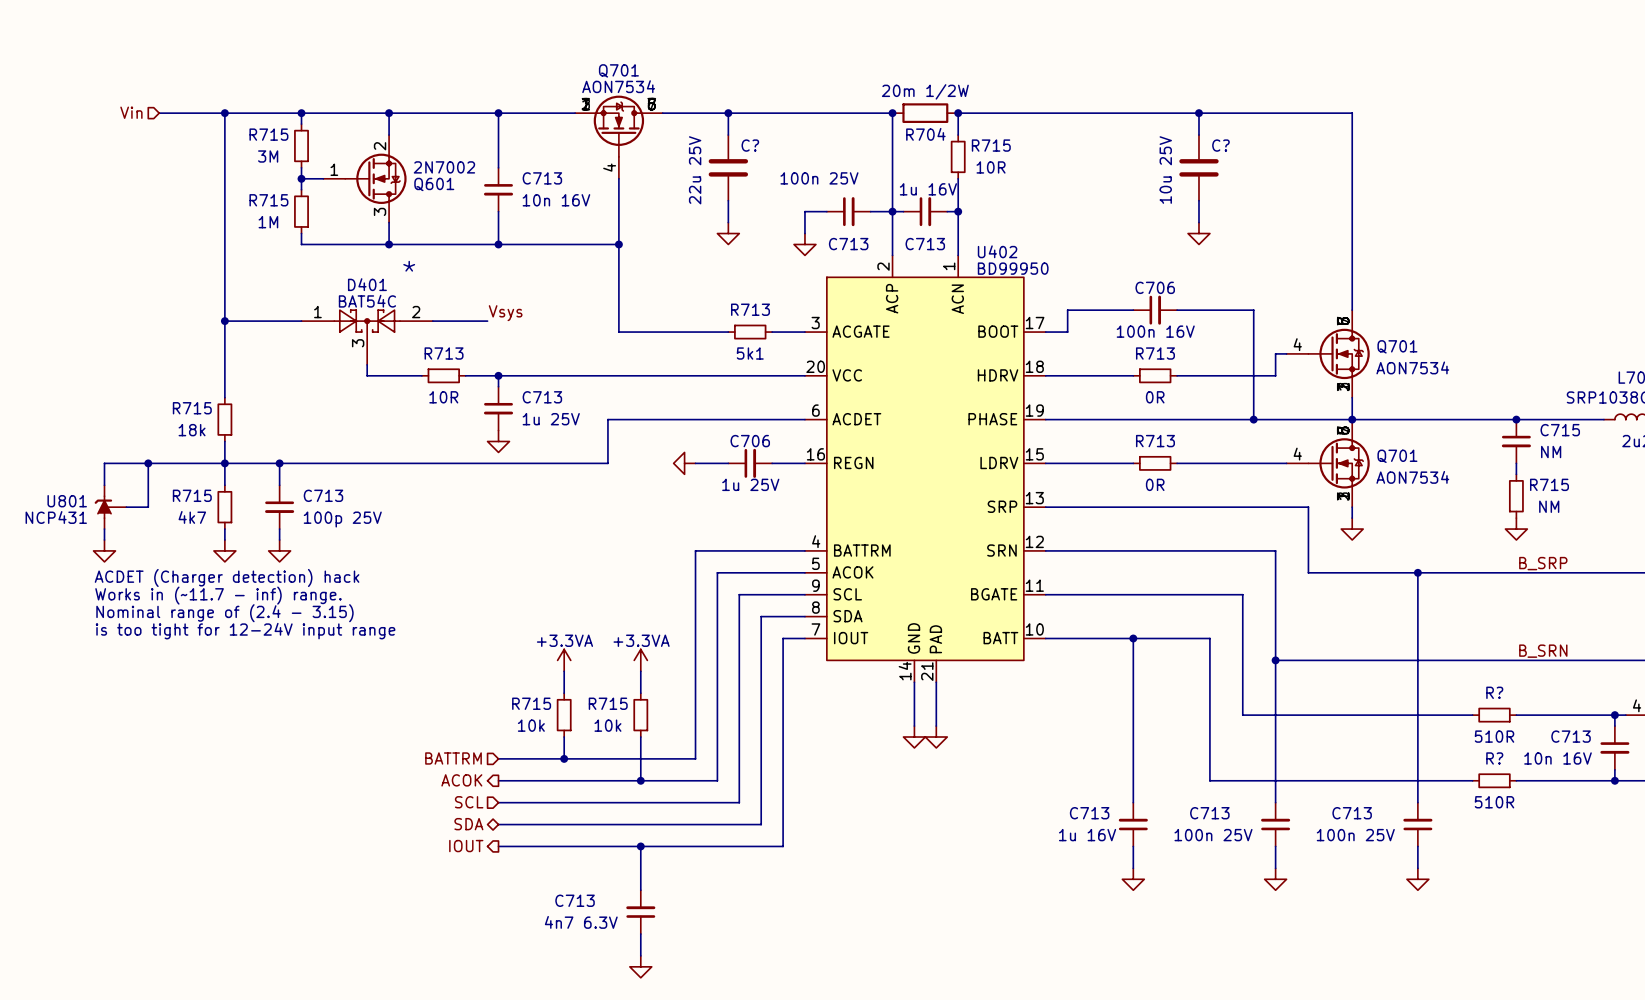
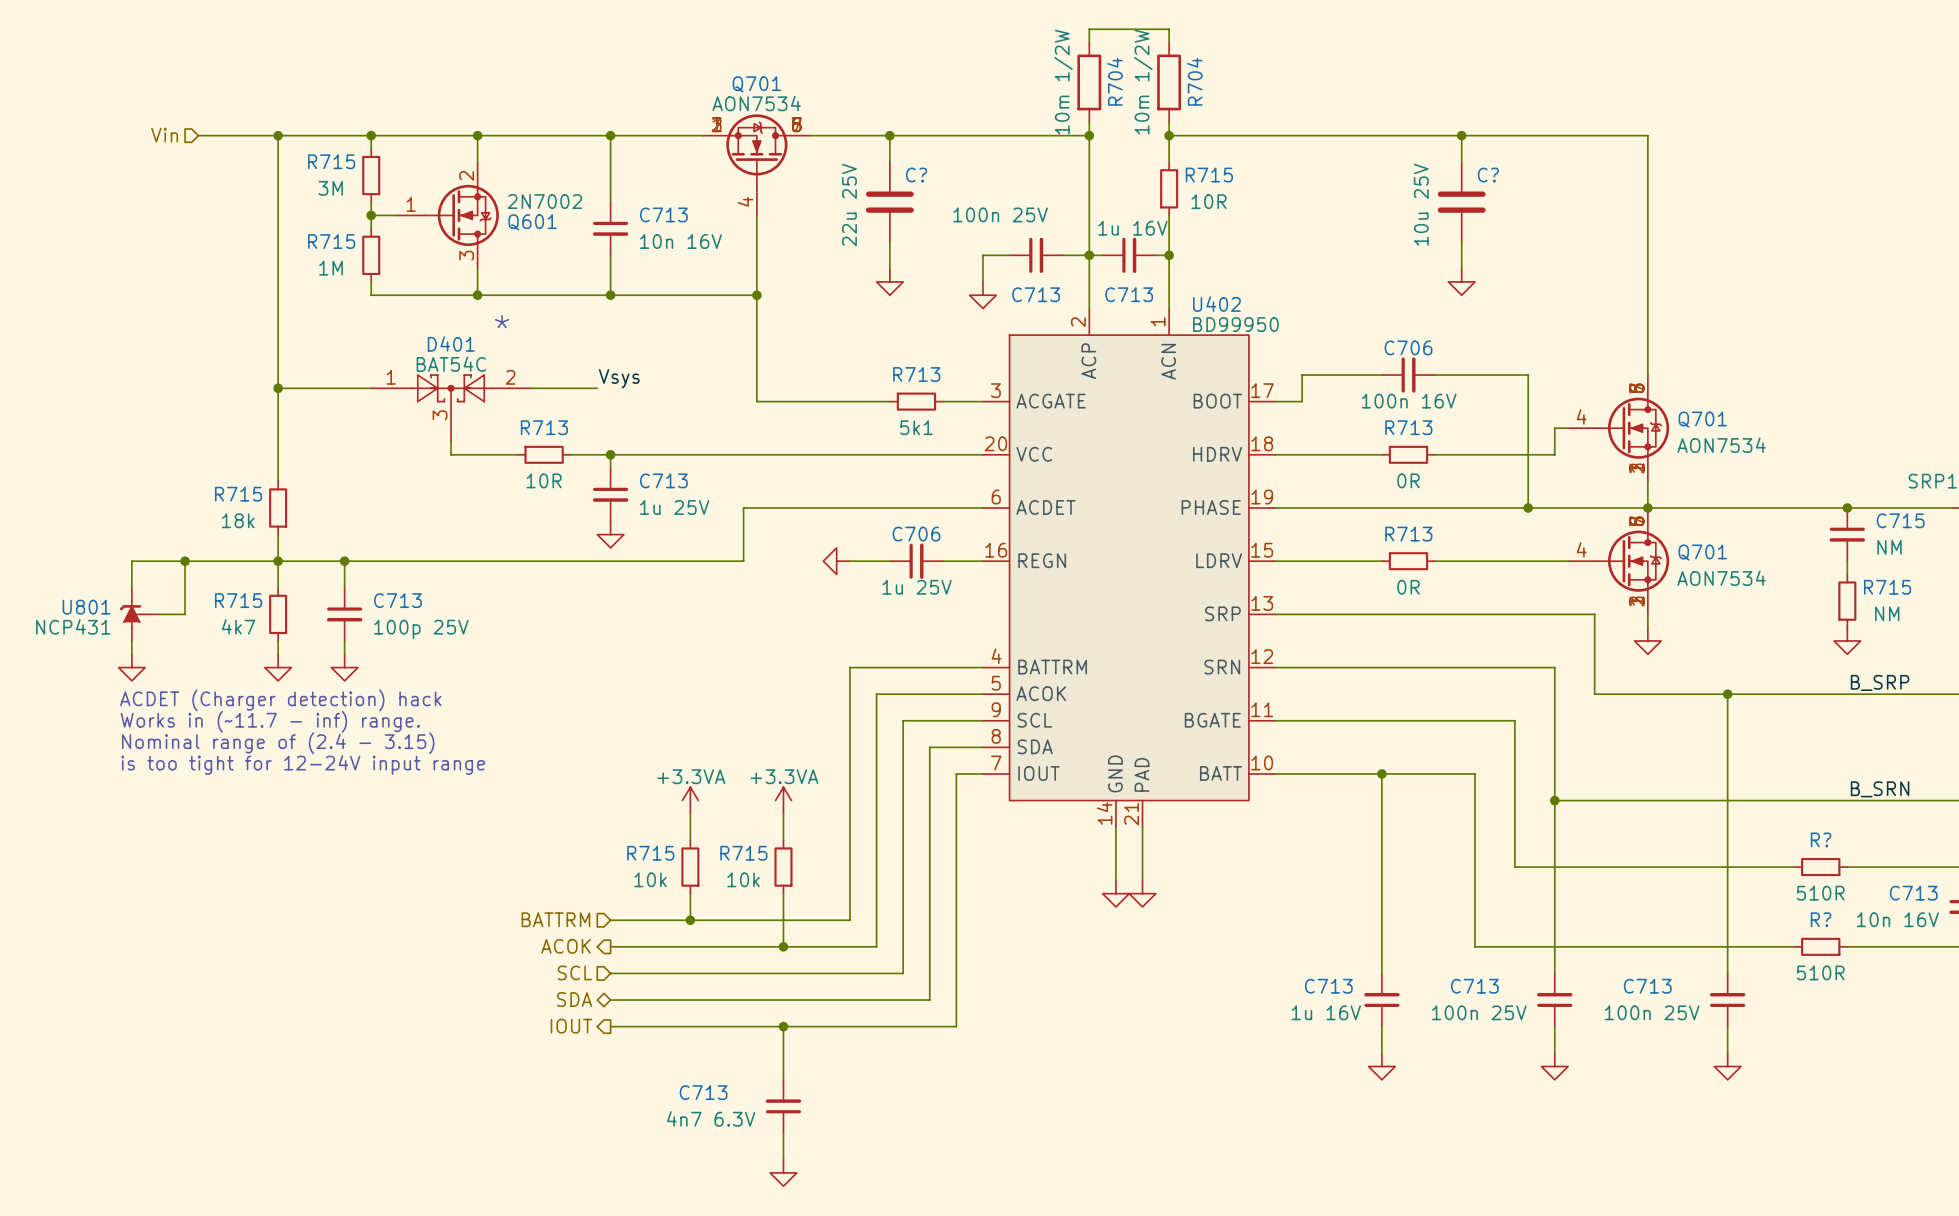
wire: none -> (1089, 42) (1089, 29) (1169, 29) (1169, 42)
R704: none -> 10m 1/2W (1089, 82)
R704: none -> 10m 1/2W (1169, 82)
wire: none -> (1089, 122) (1089, 135)
wire: none -> (1169, 122) (1169, 135)
R704: 20m 1/2W (925, 113) -> none

